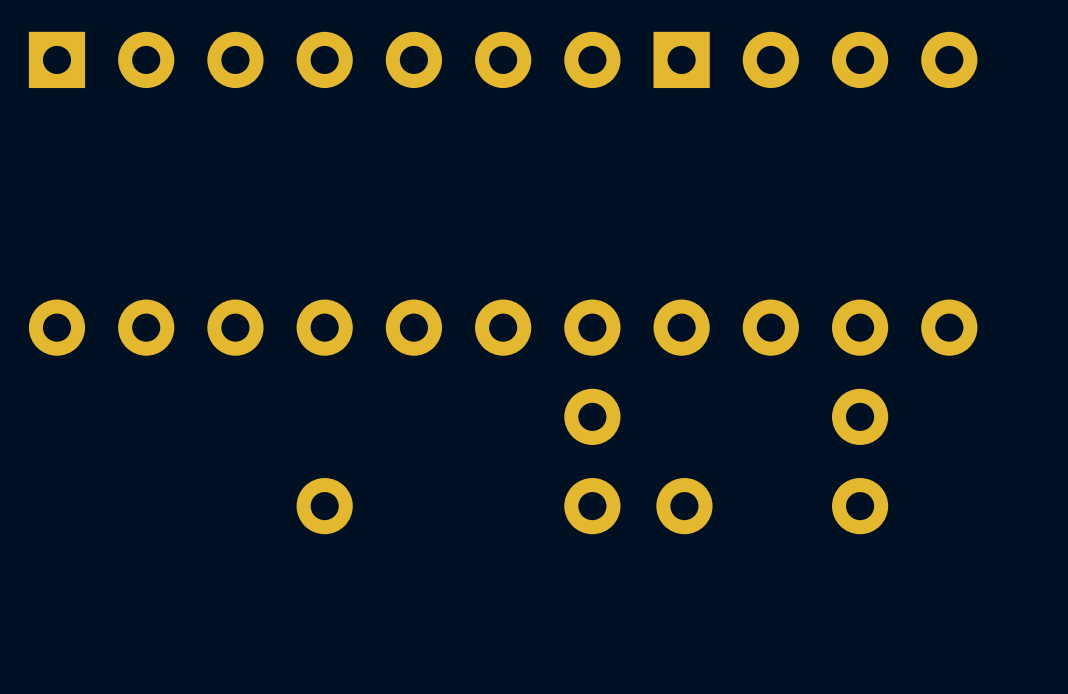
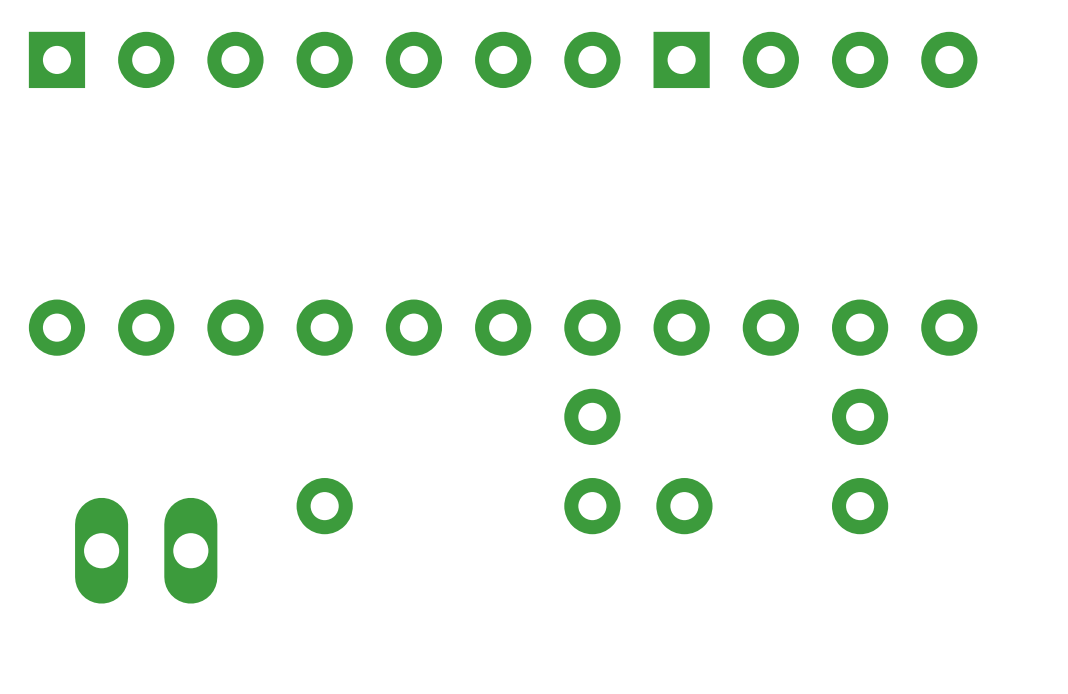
part: none -> (146, 550)

